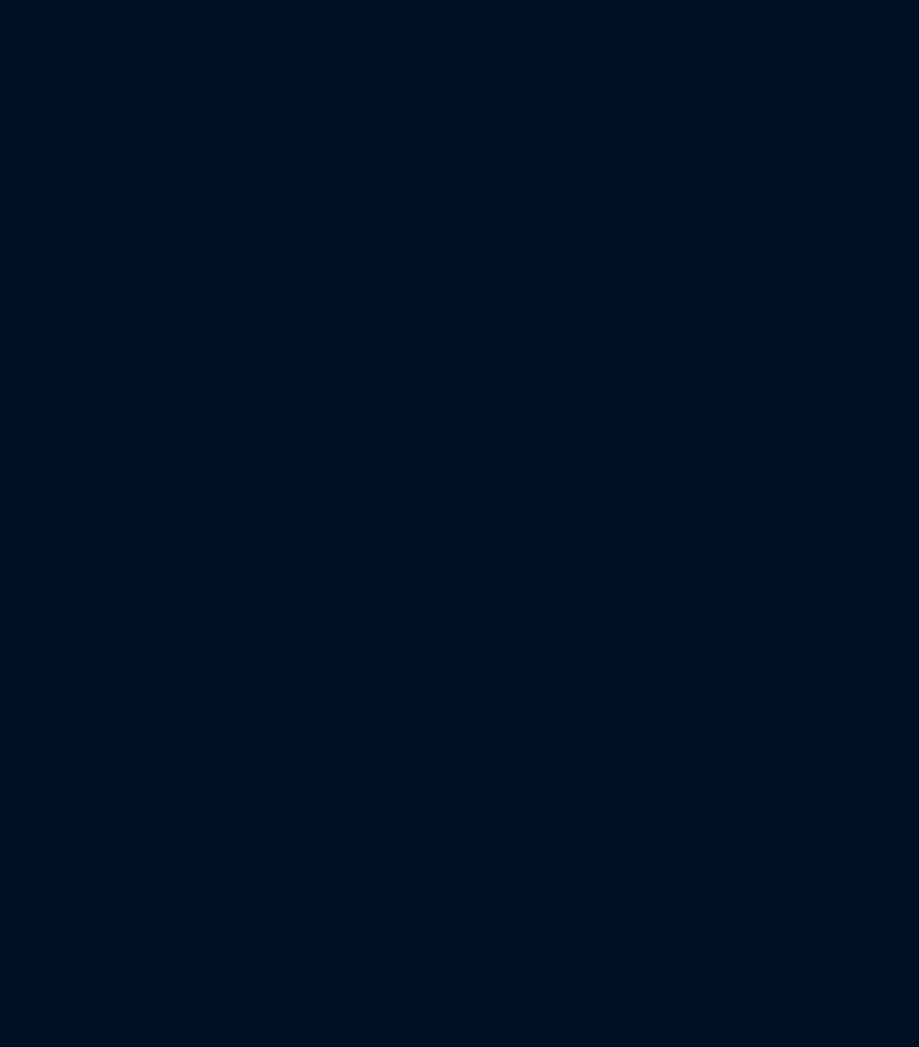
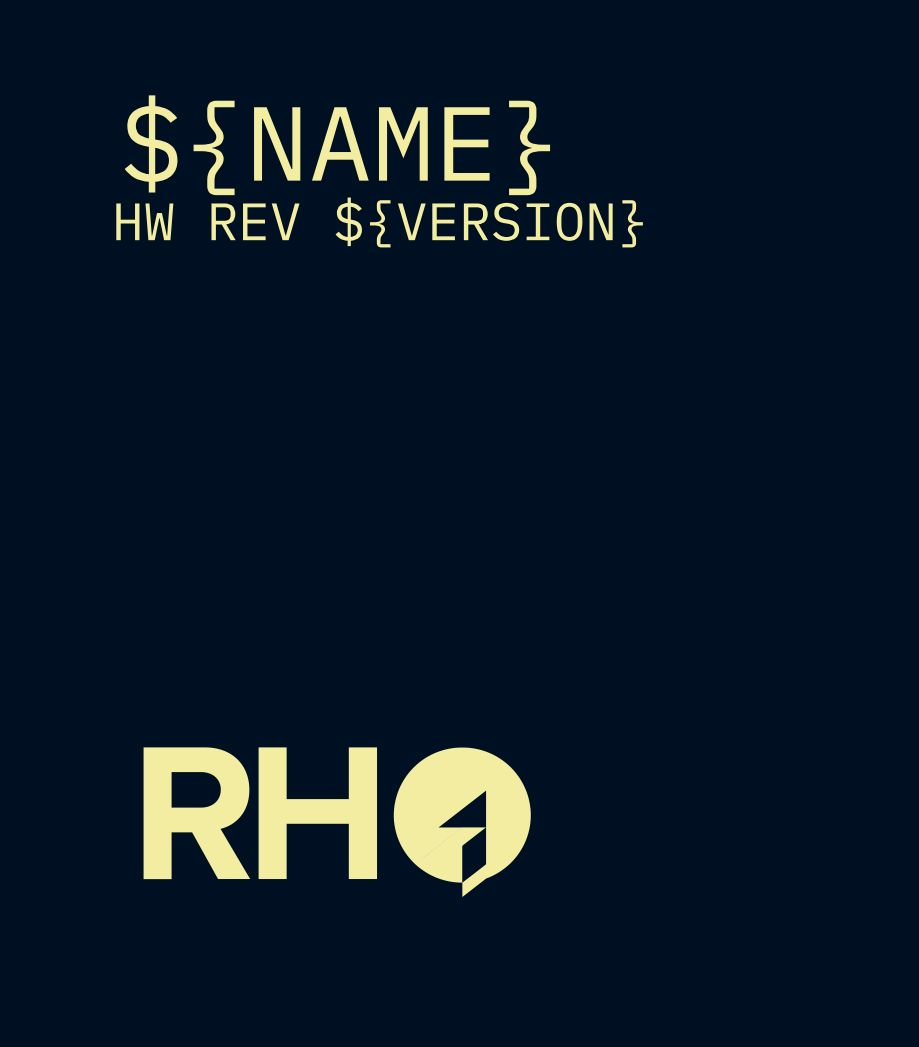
text: none -> ${NAME} (337, 145)
text: none -> HW REV ${VERSION} (379, 222)
drawing: none -> [143, 747, 531, 898]

